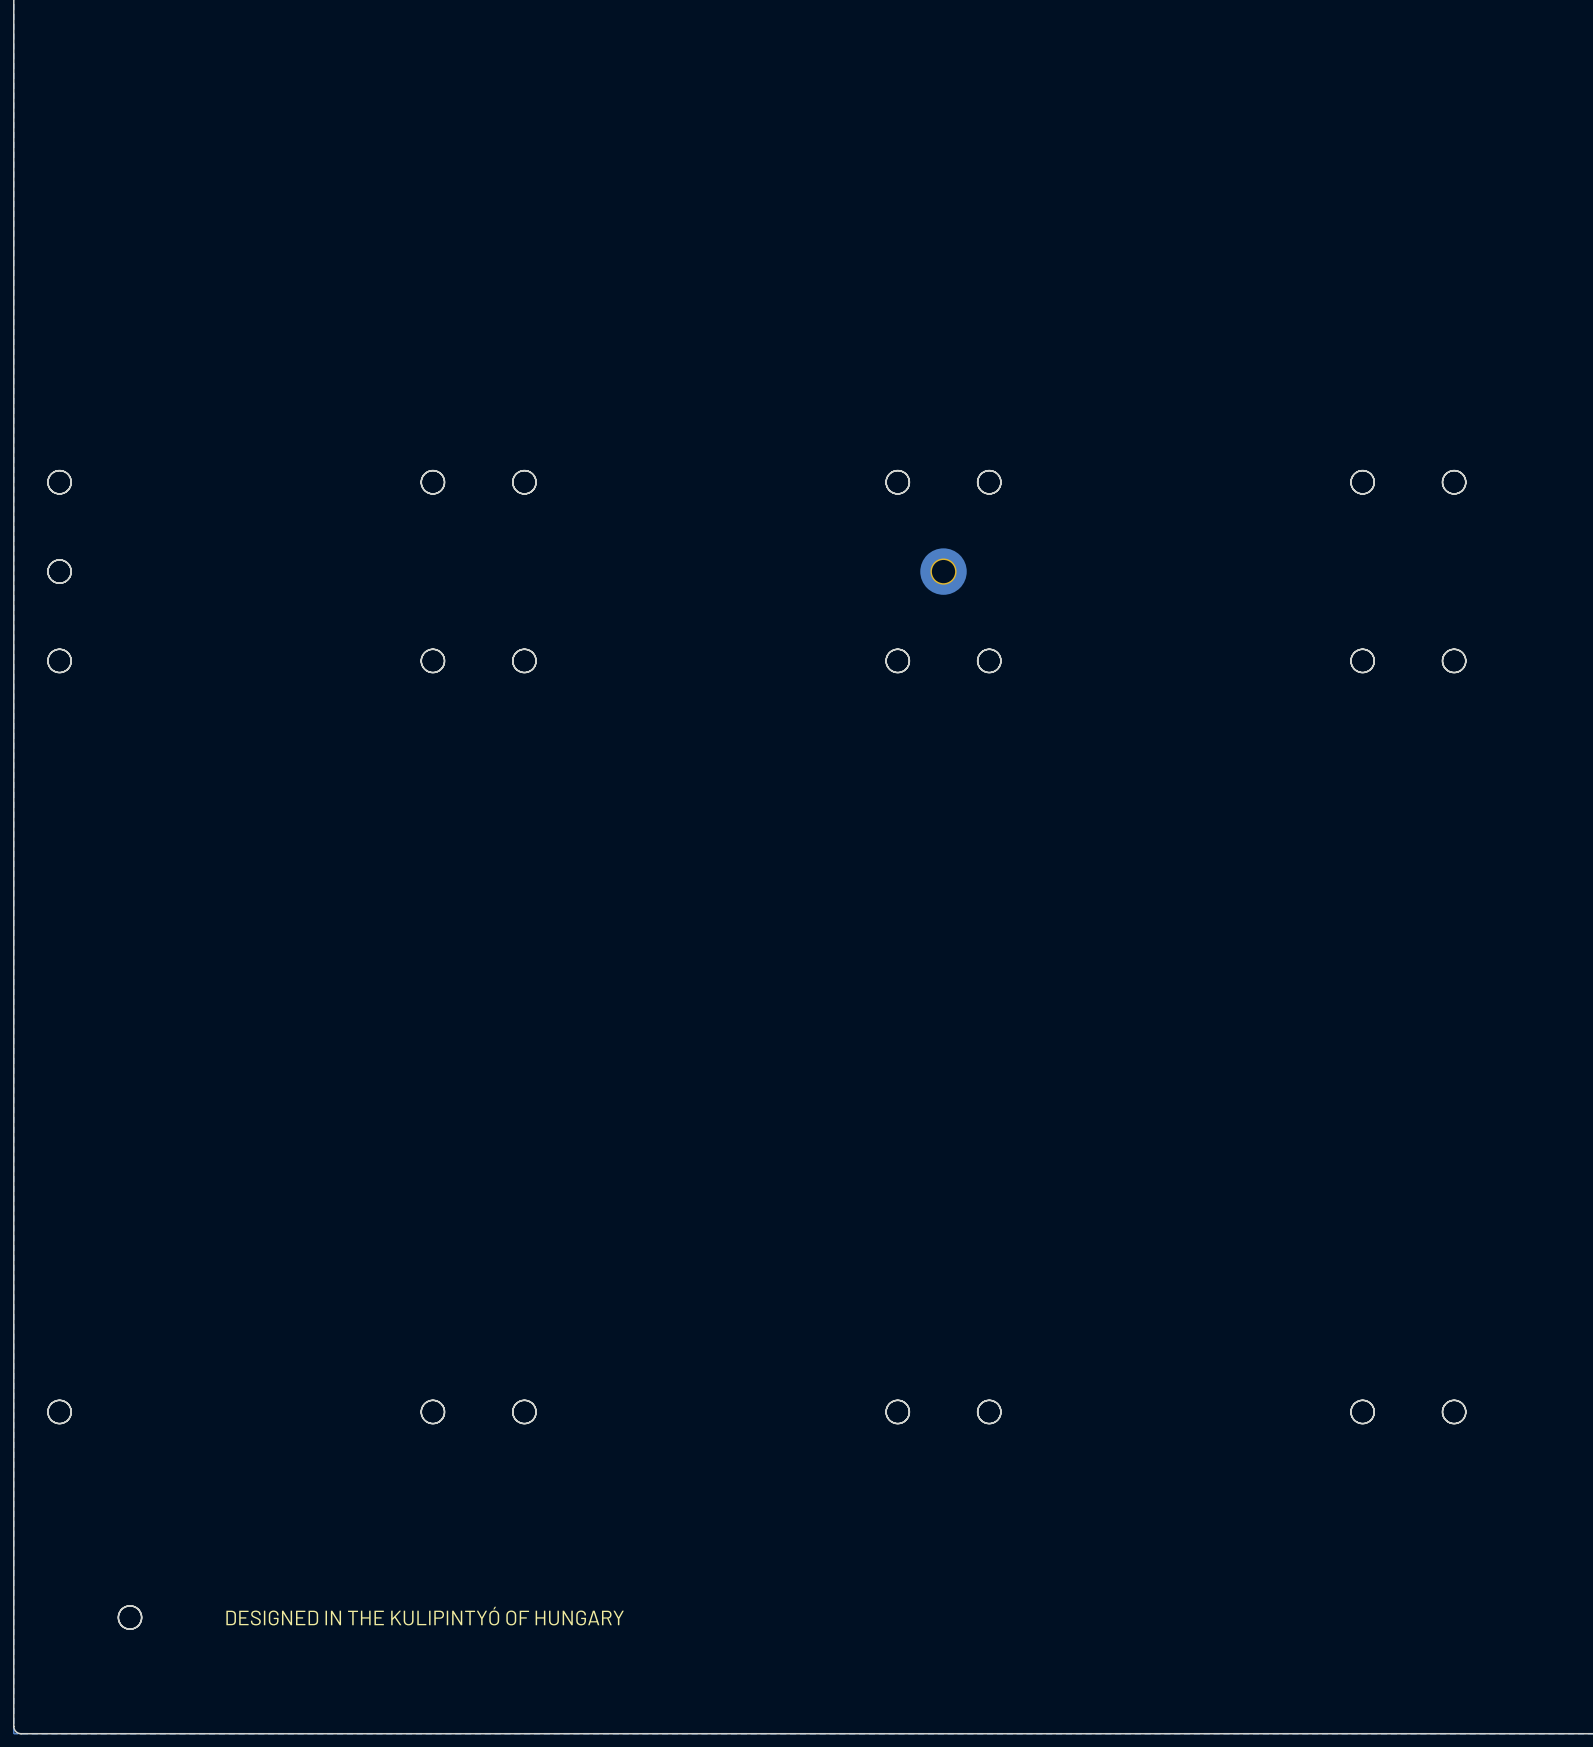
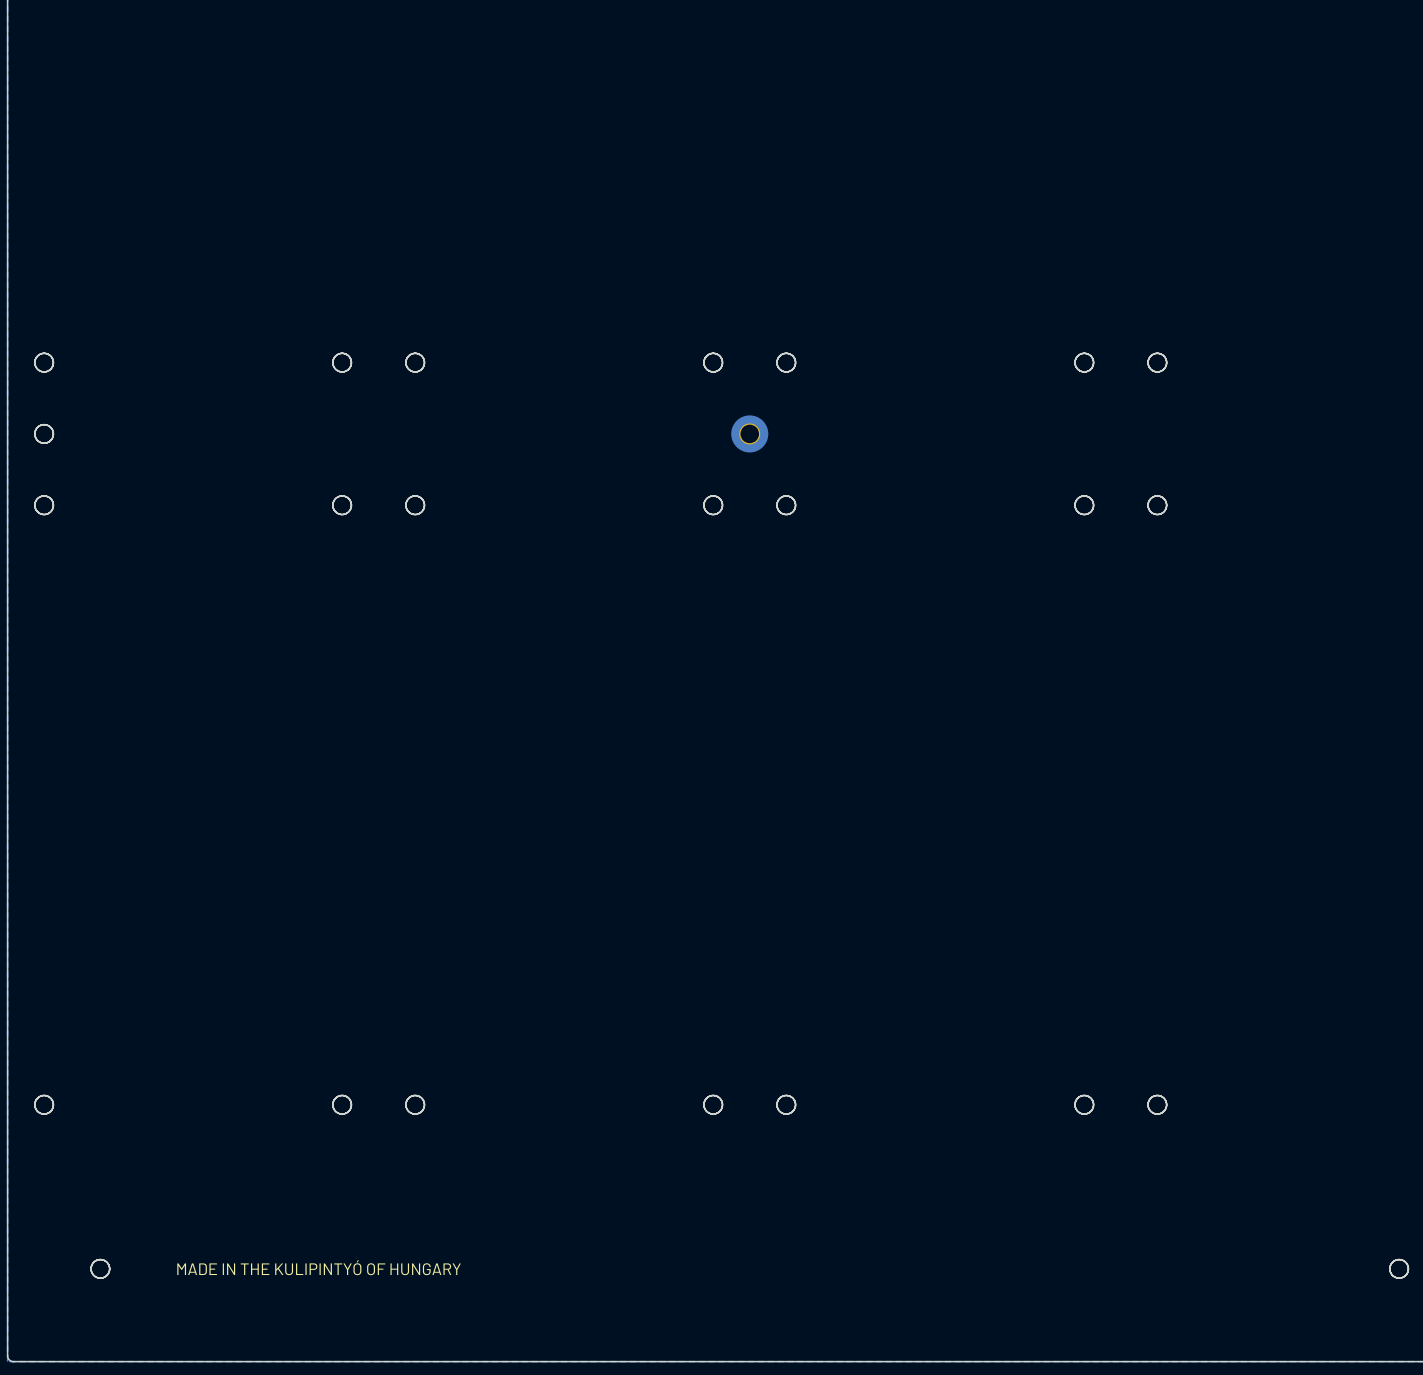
text: DESIGNED IN THE KULIPINTYÓ OF HUNGARY (425, 1616) -> MADE IN THE KULIPINTYÓ OF HUNGARY (319, 1267)

